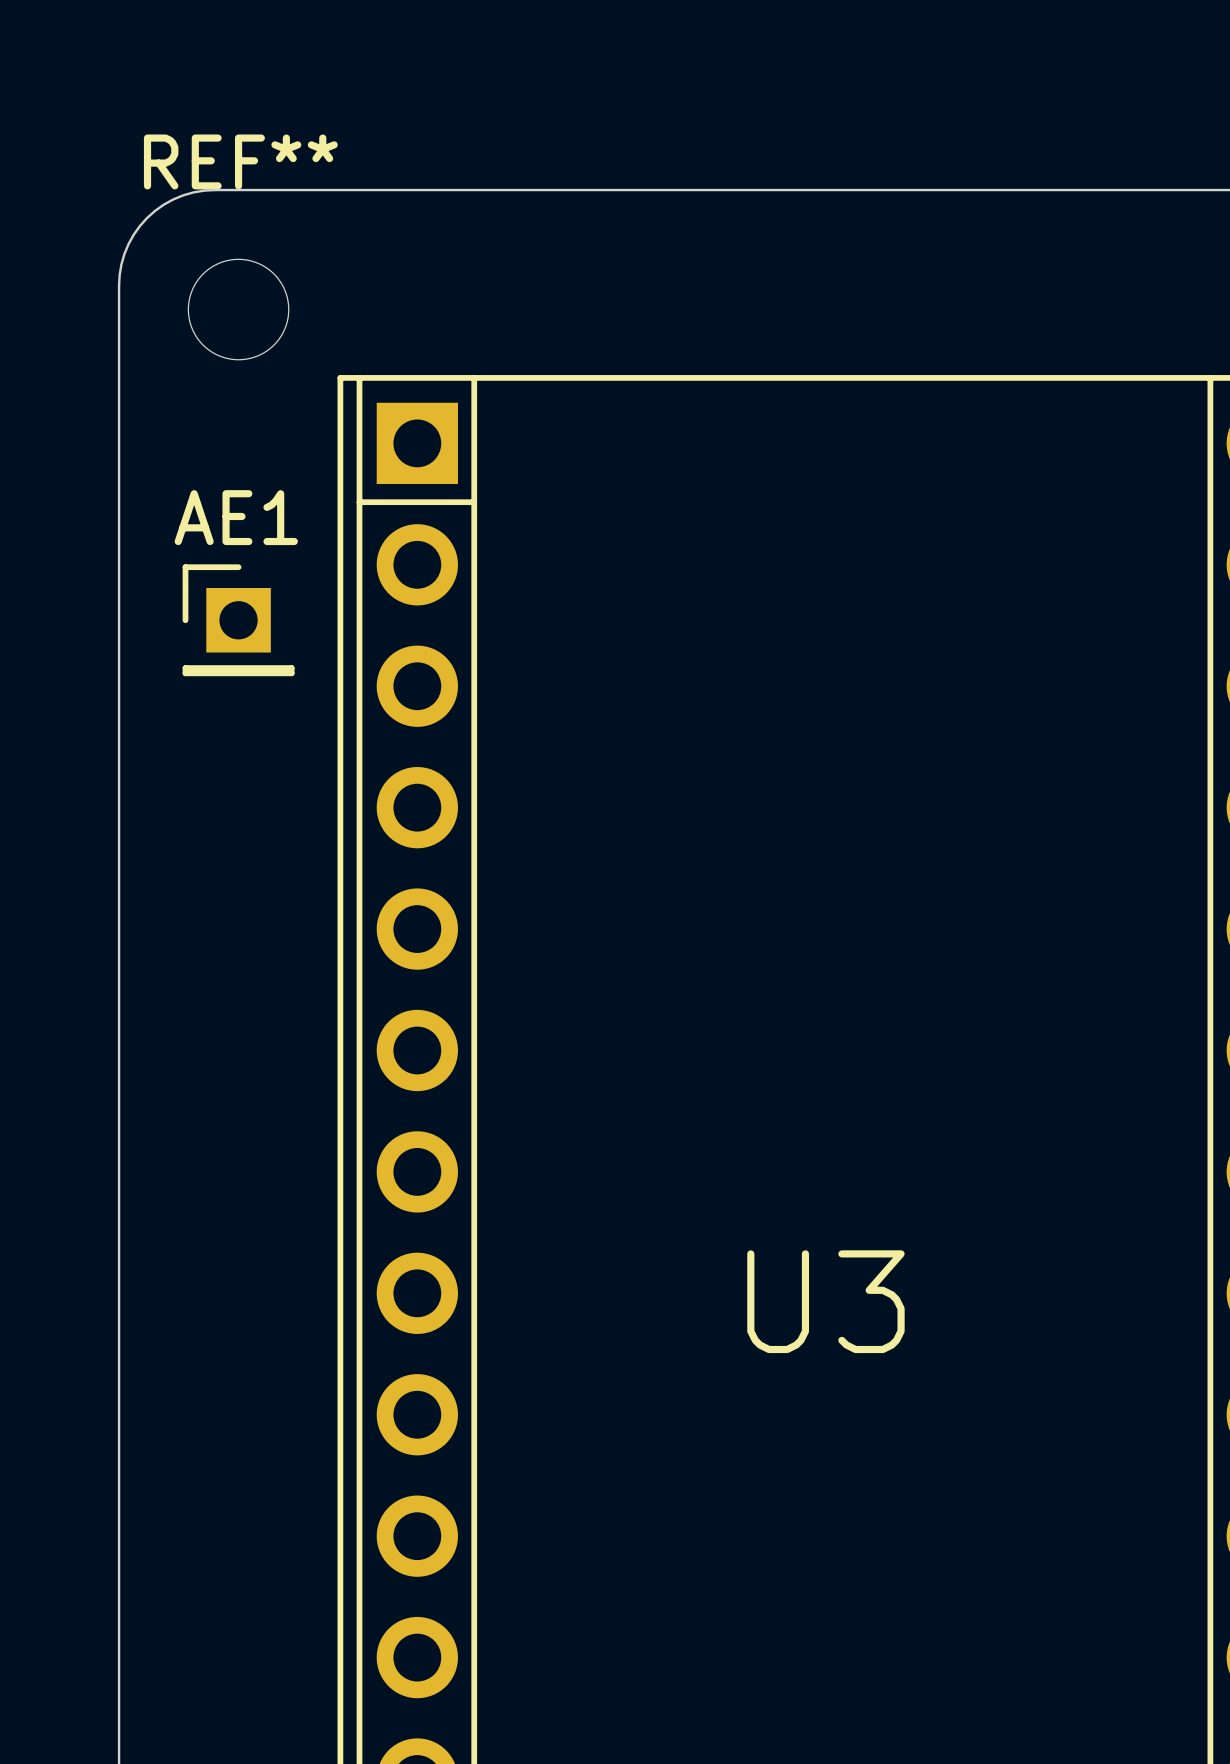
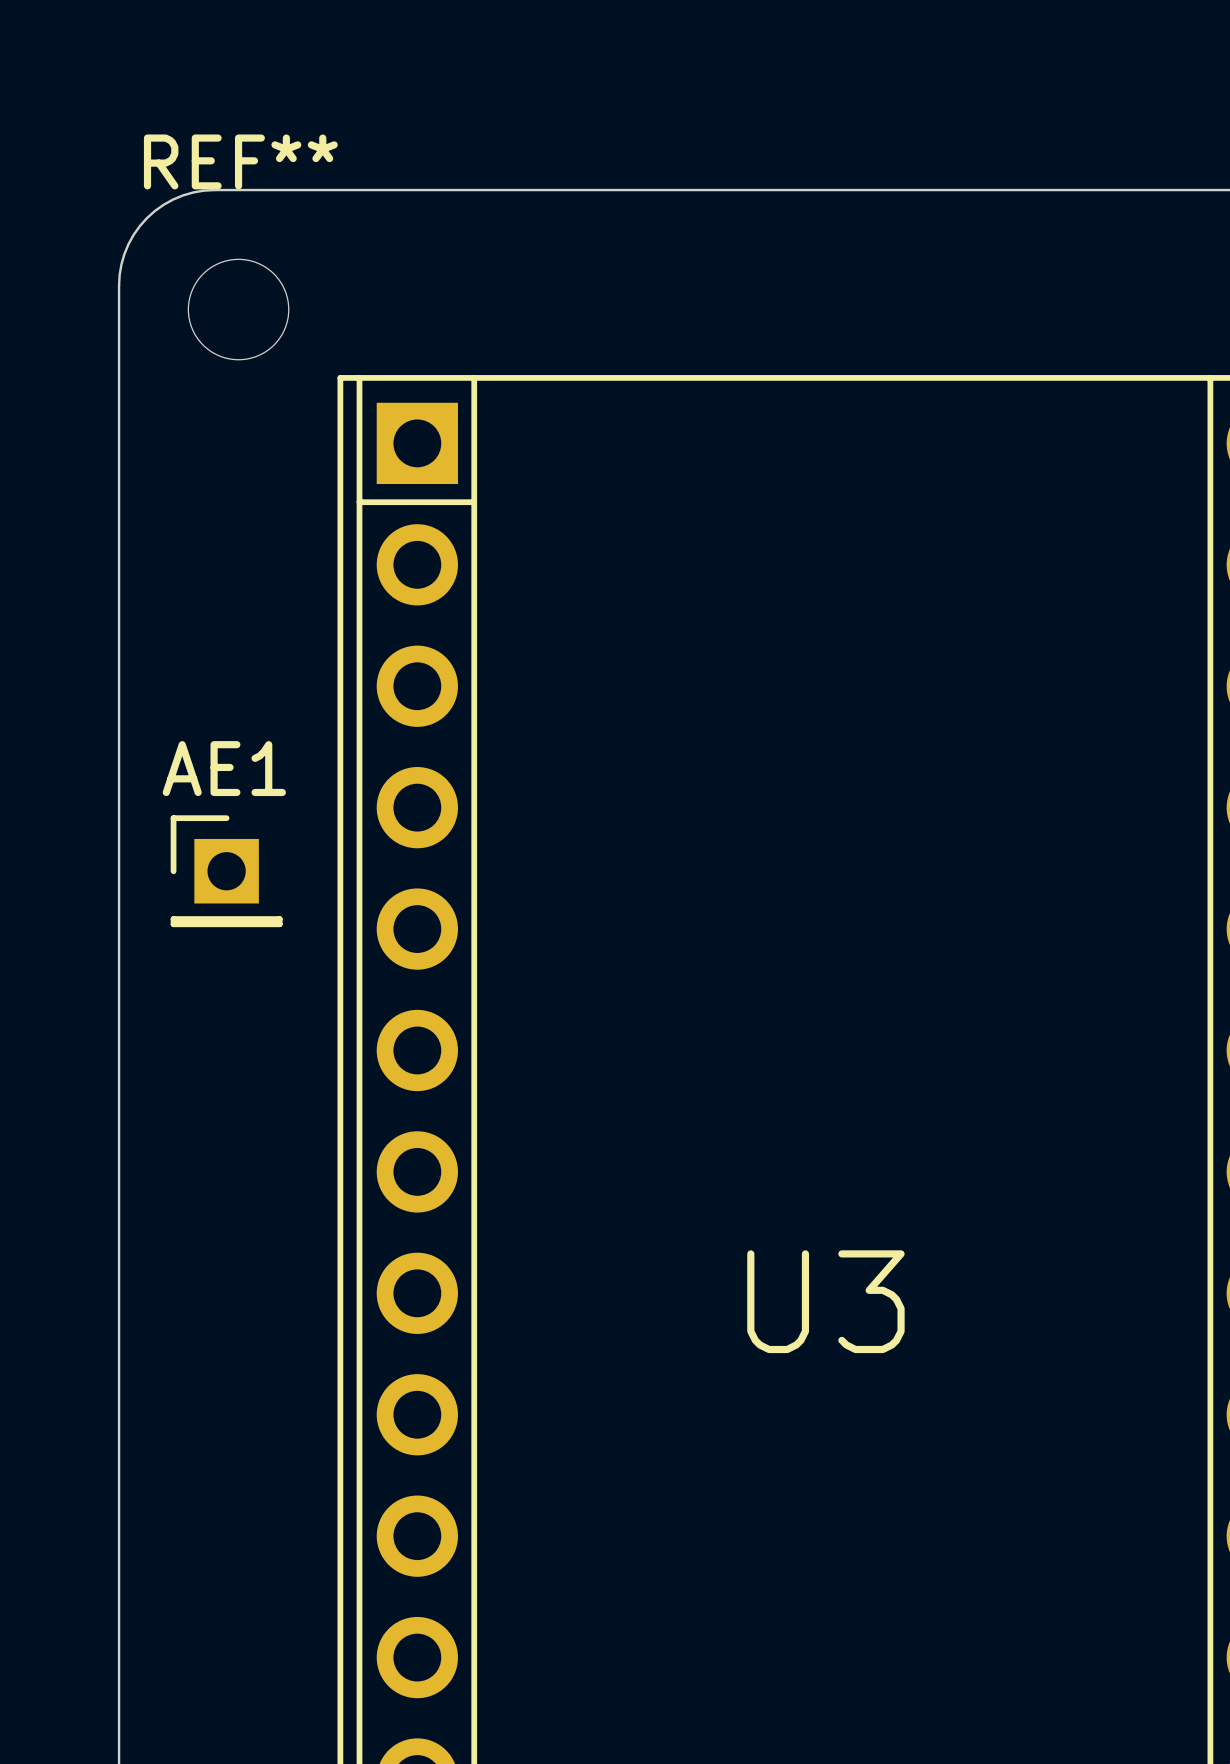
AE1 position: (238, 620) -> (226, 871)

